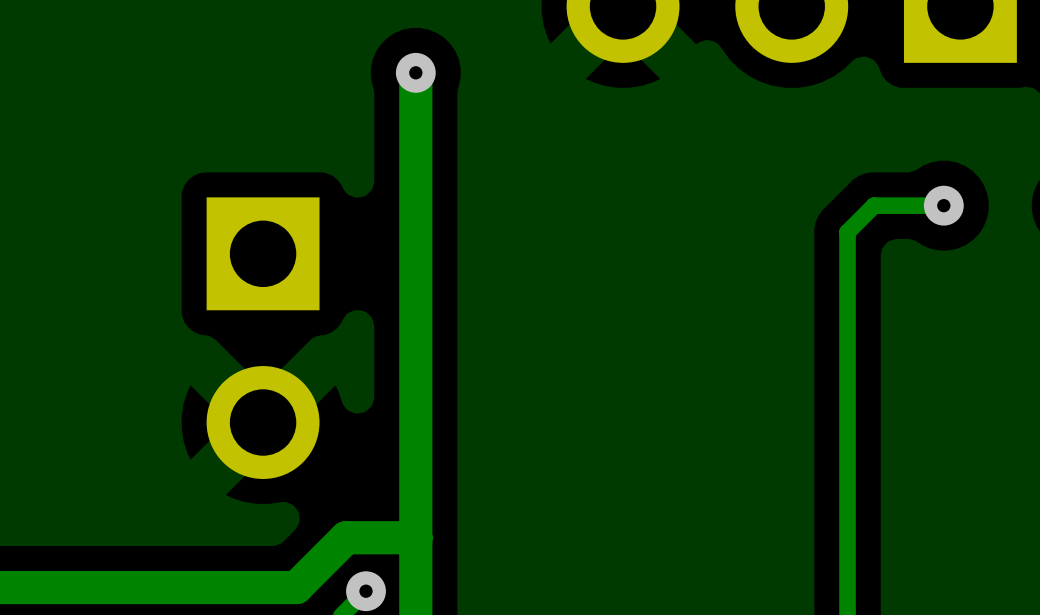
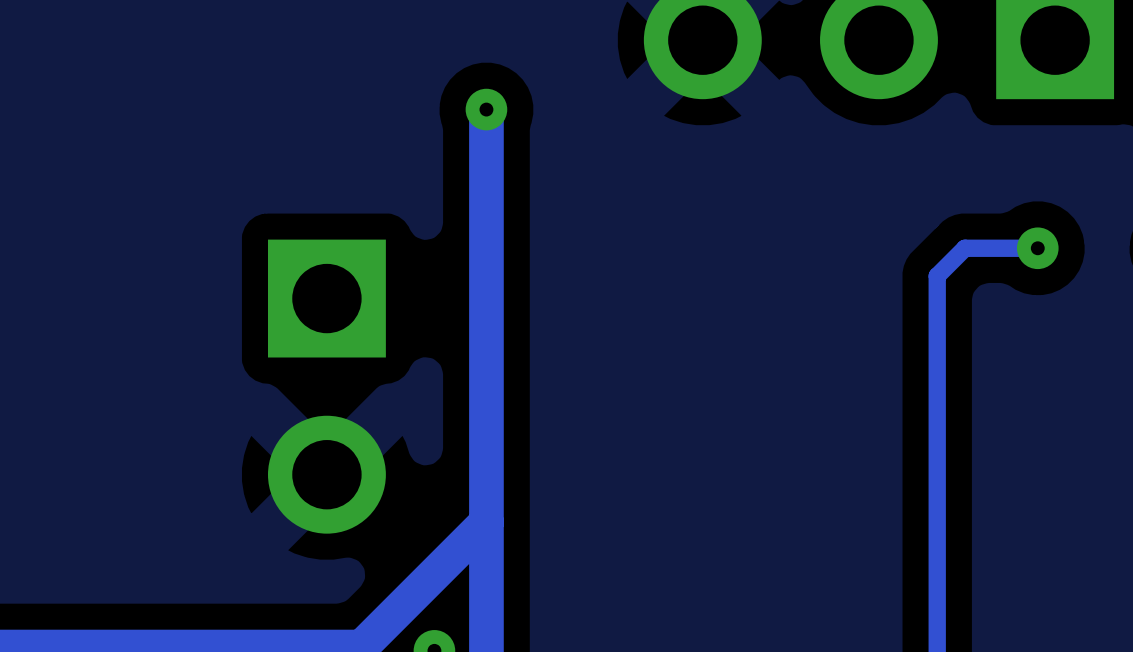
track: (415, 537) (346, 537) -> (486, 522) (413, 595)

